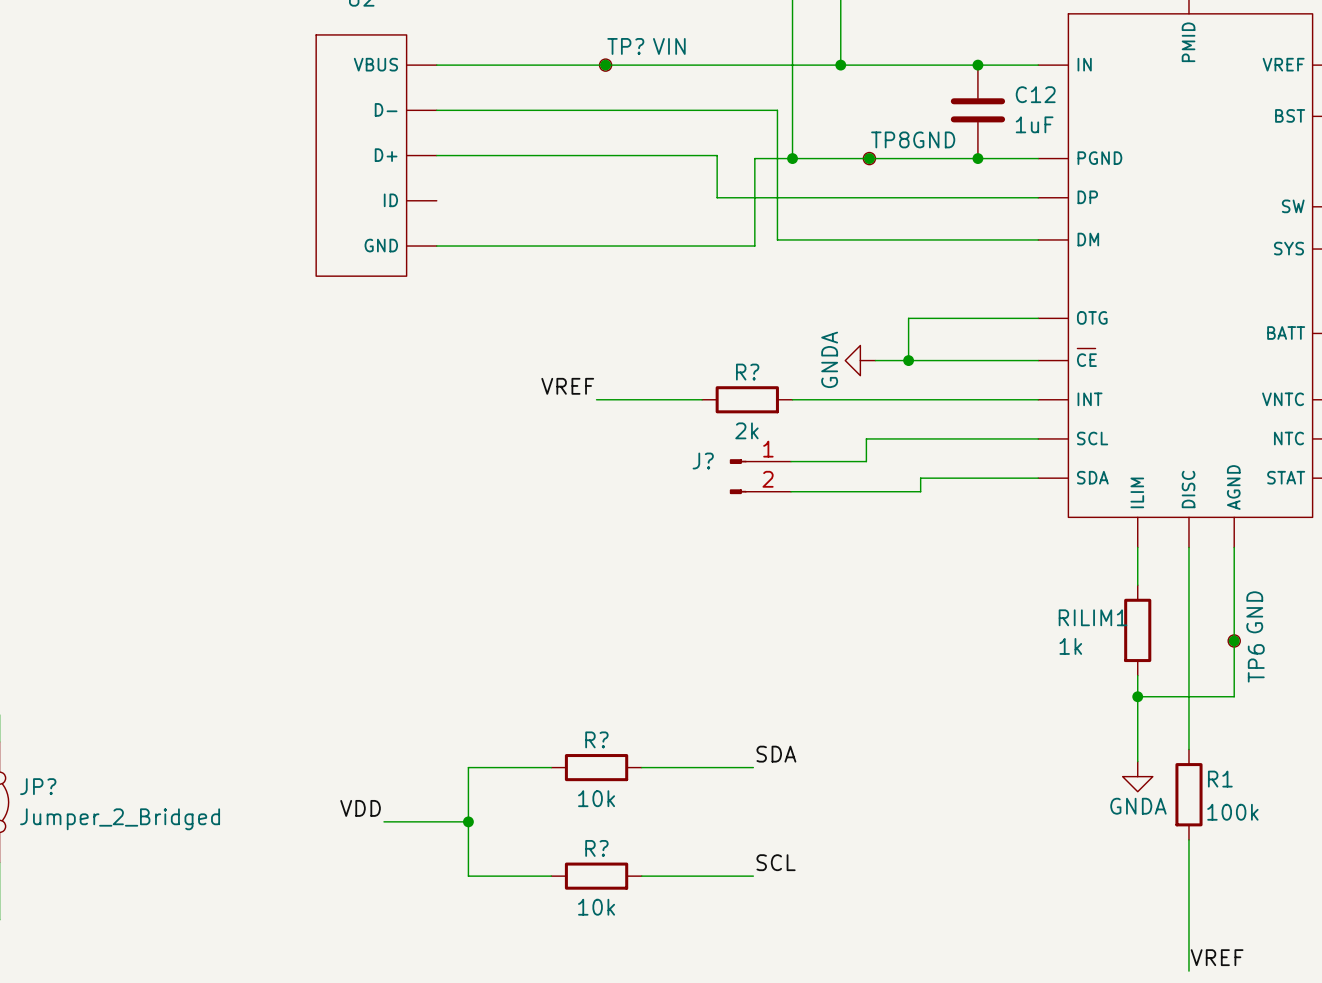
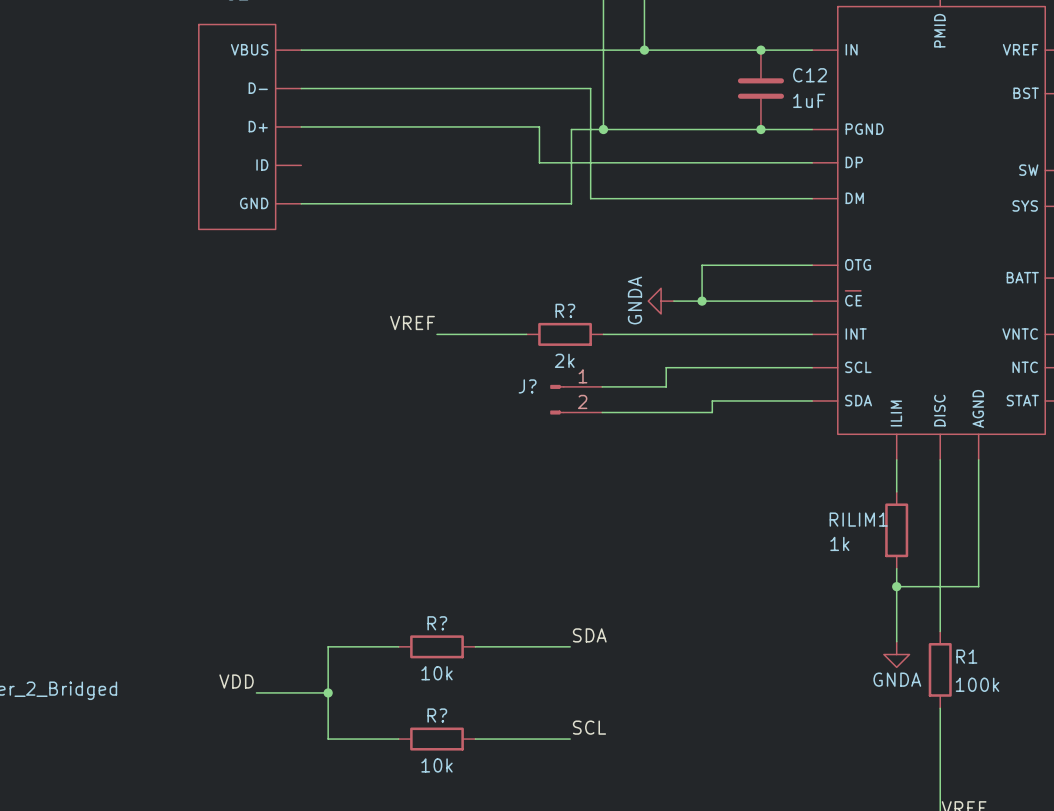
junction: (605, 65) -> none
TP?: (605, 65) -> none
junction: (869, 158) -> none
TP8: (869, 158) -> none
junction: (1234, 640) -> none
TP6: (1234, 640) -> none

